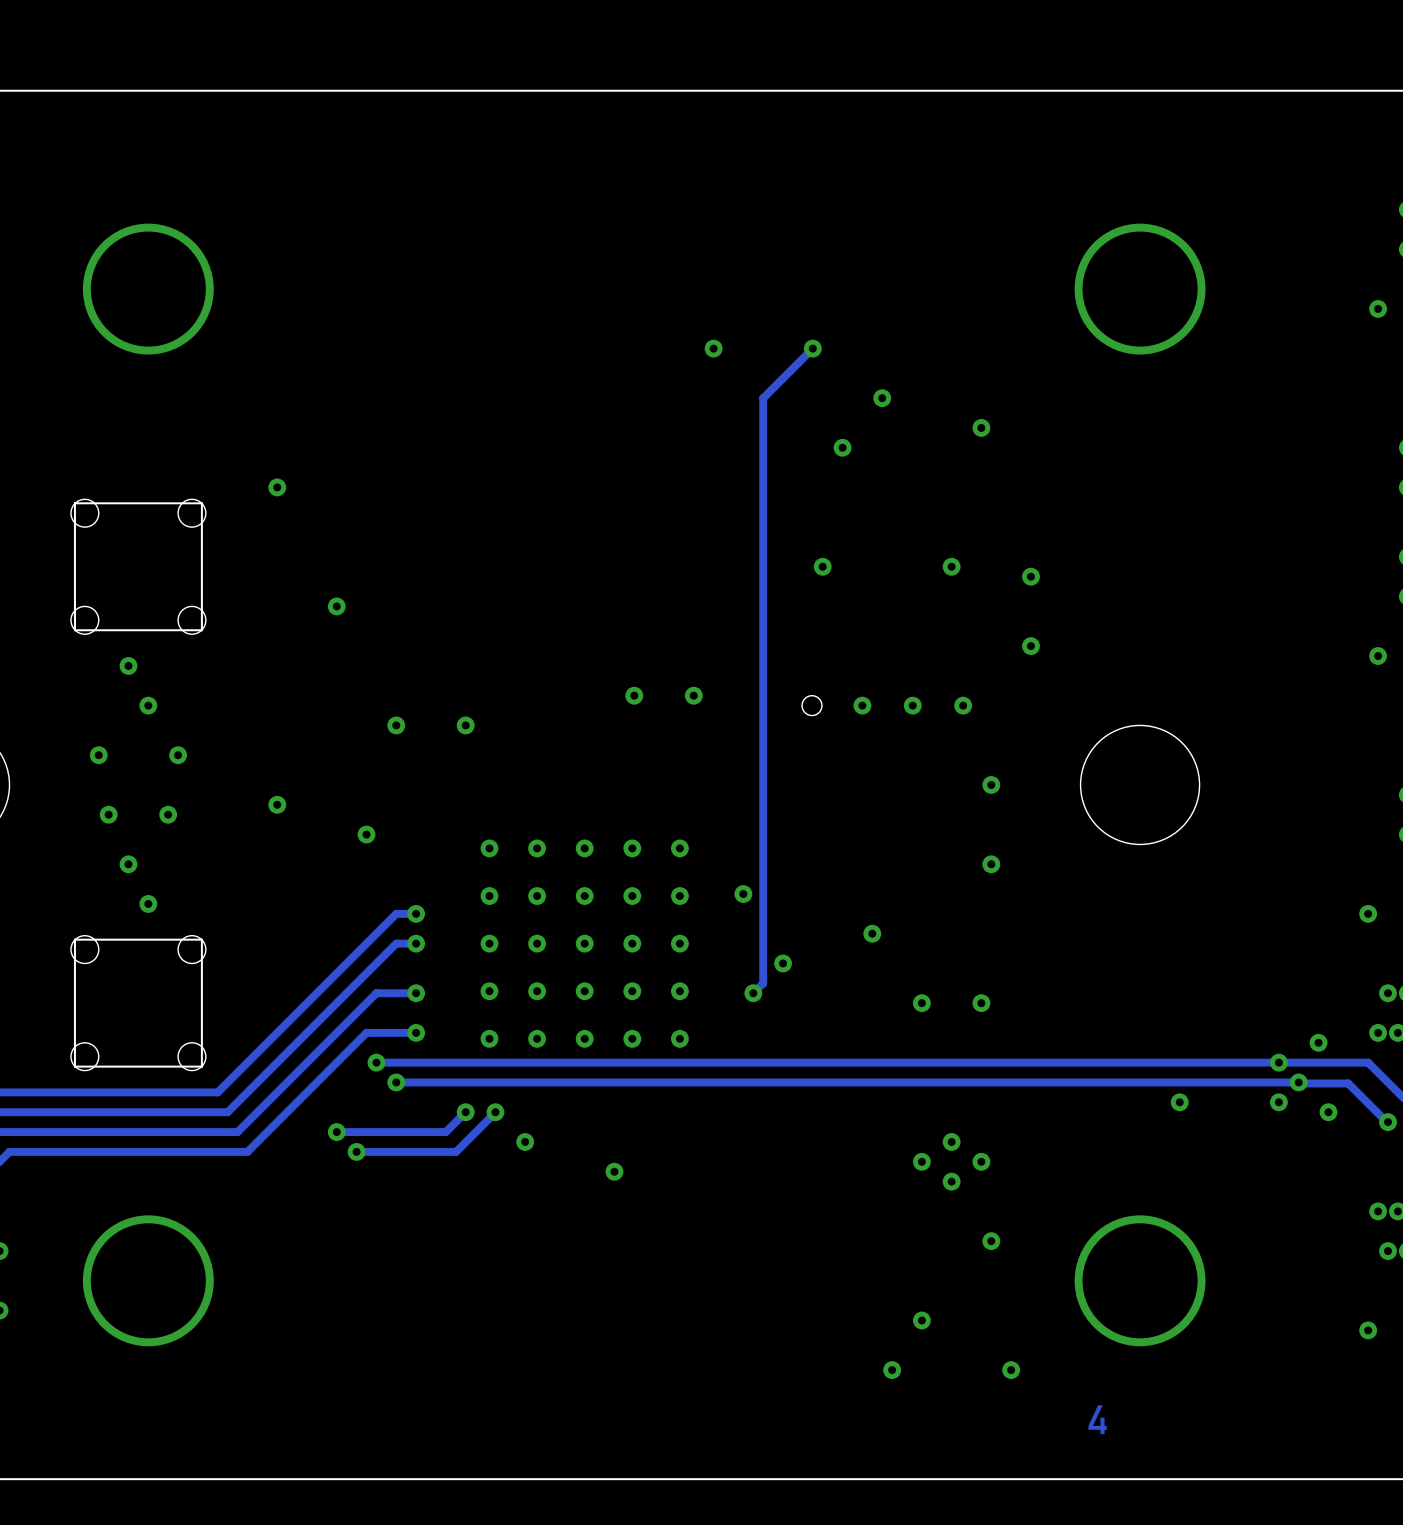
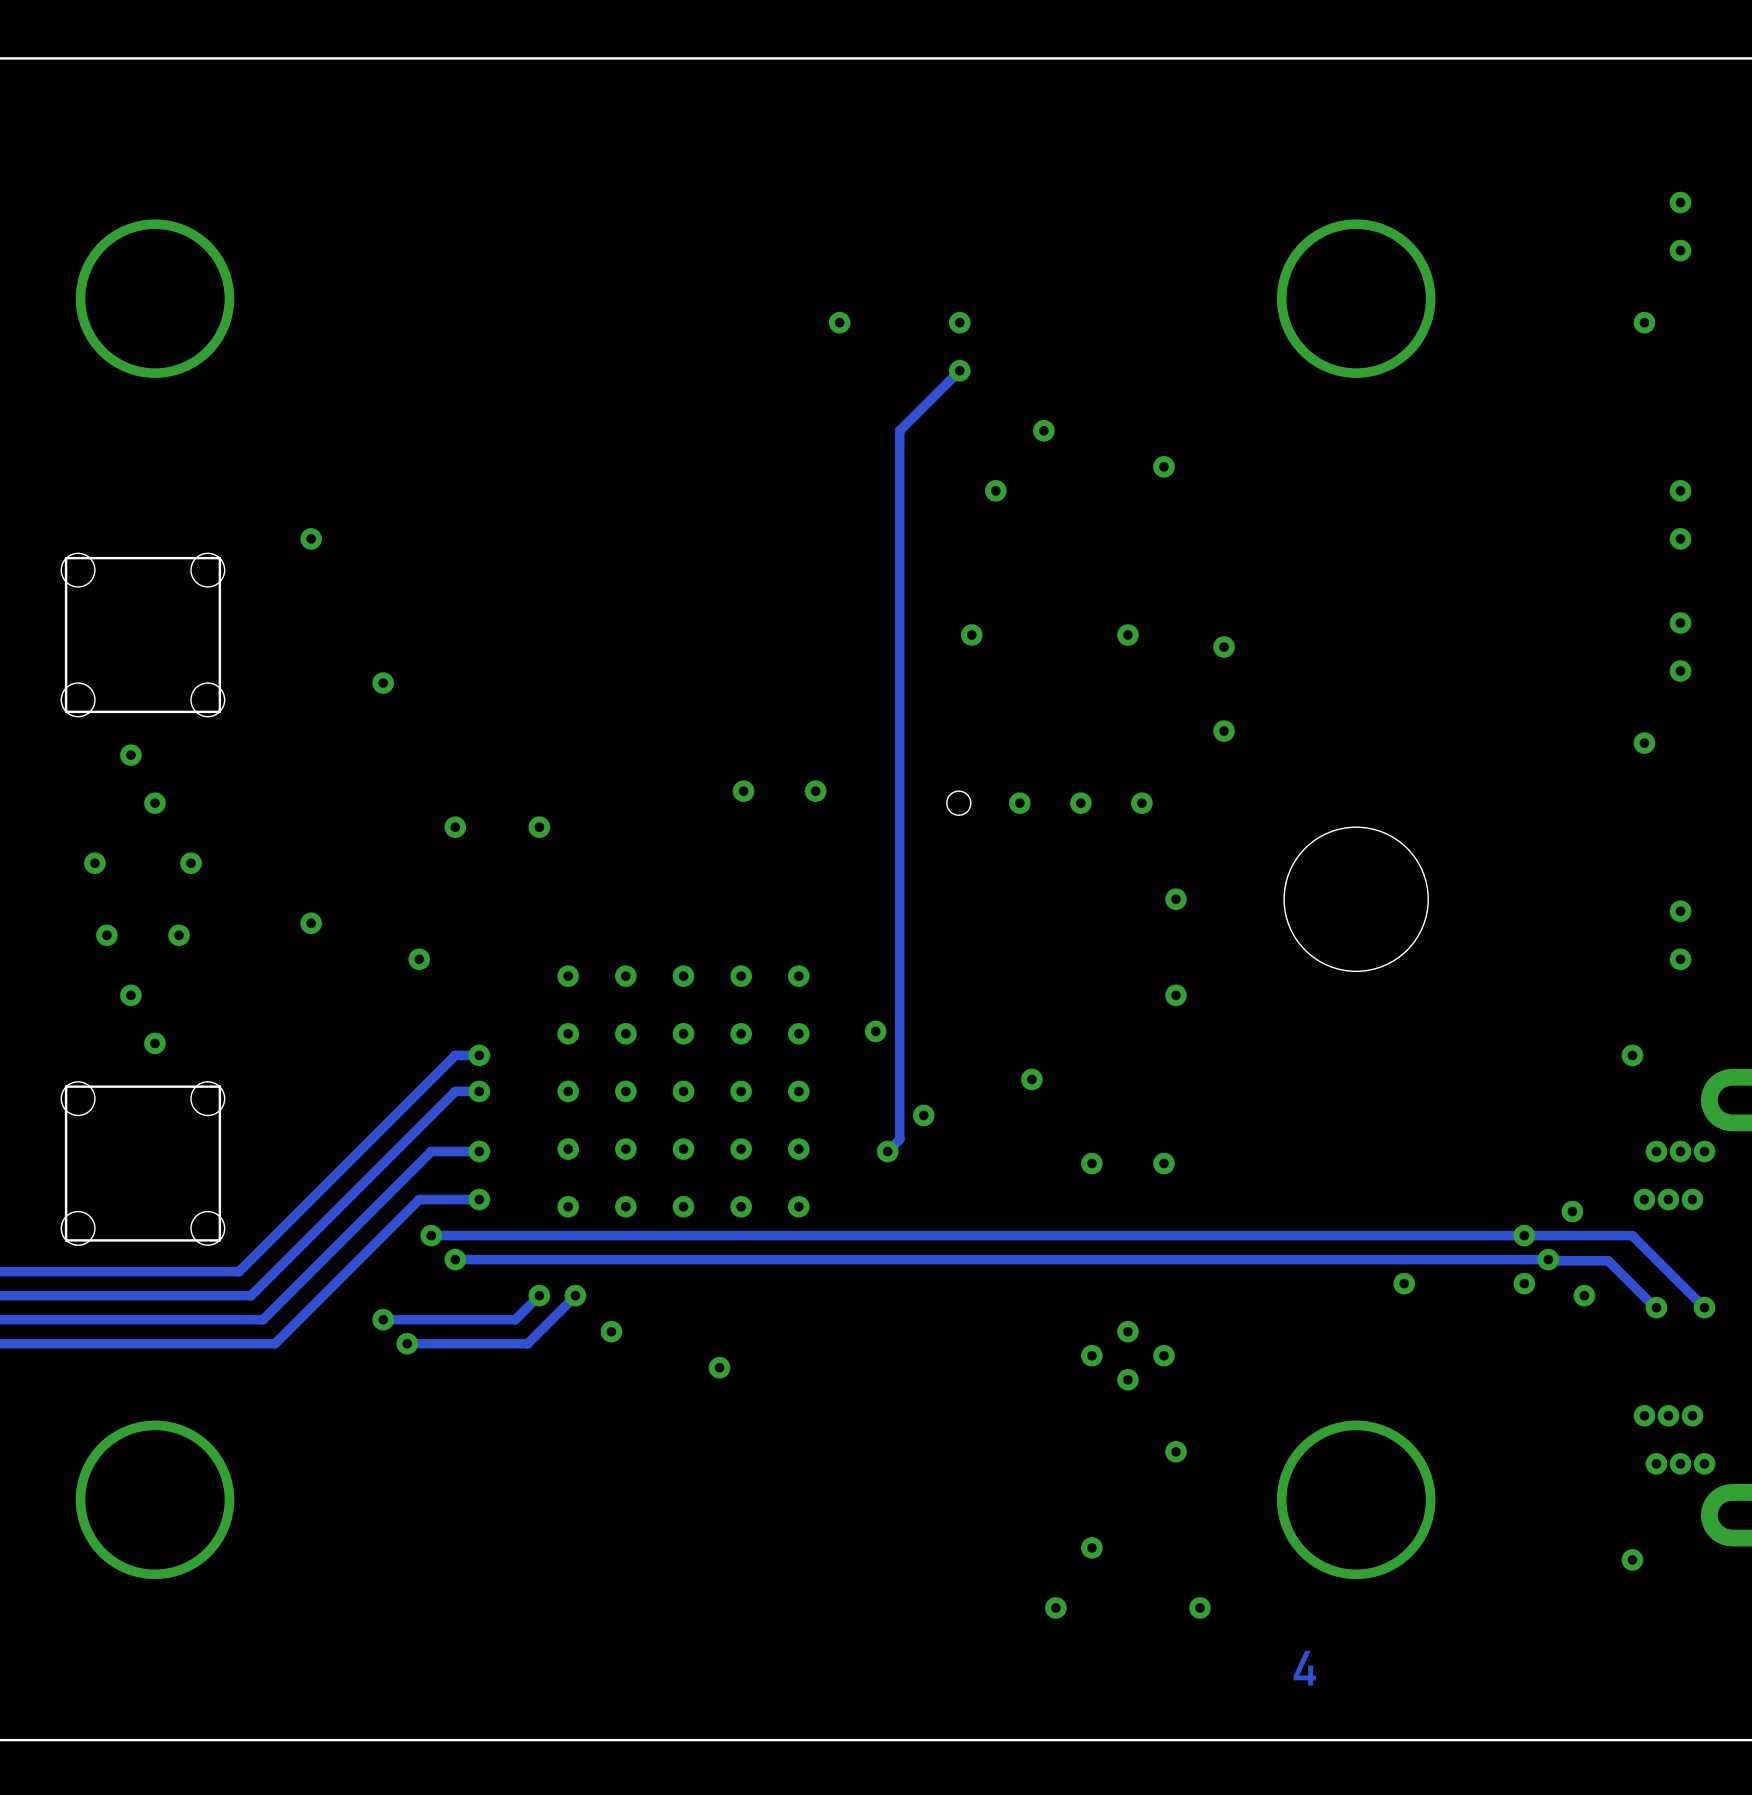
via: none -> (959, 322)
via position: (713, 348) -> (839, 322)

